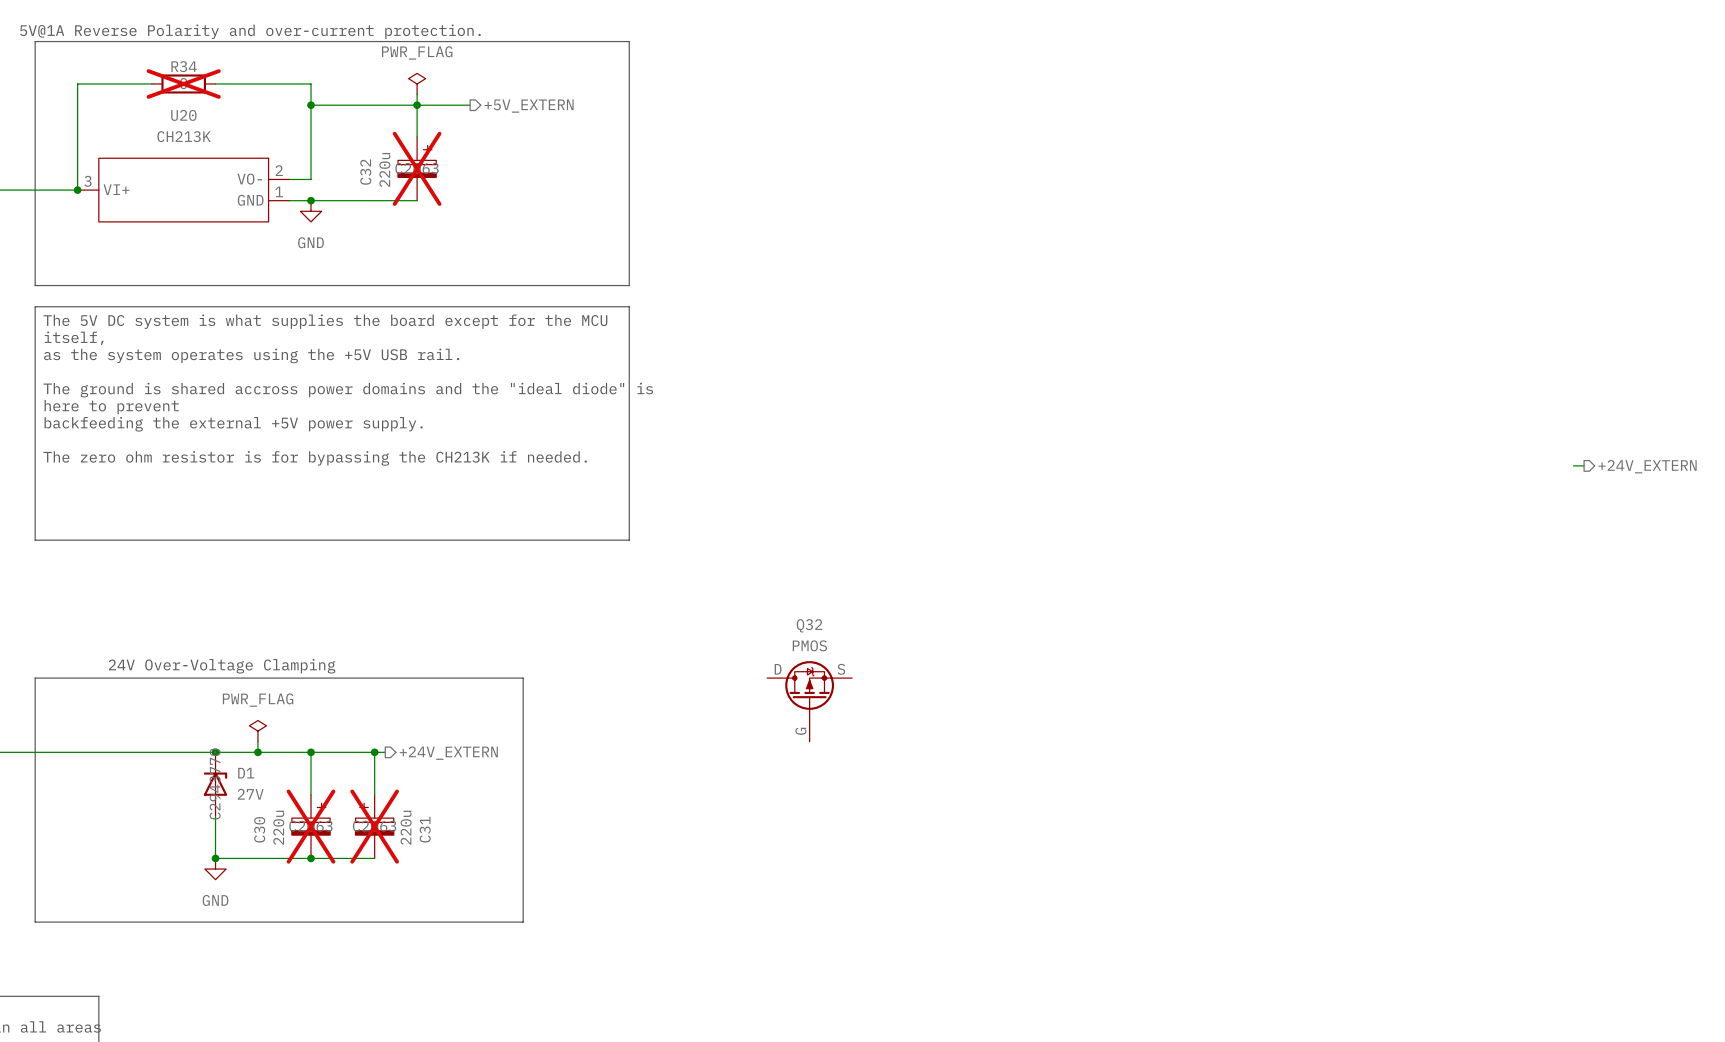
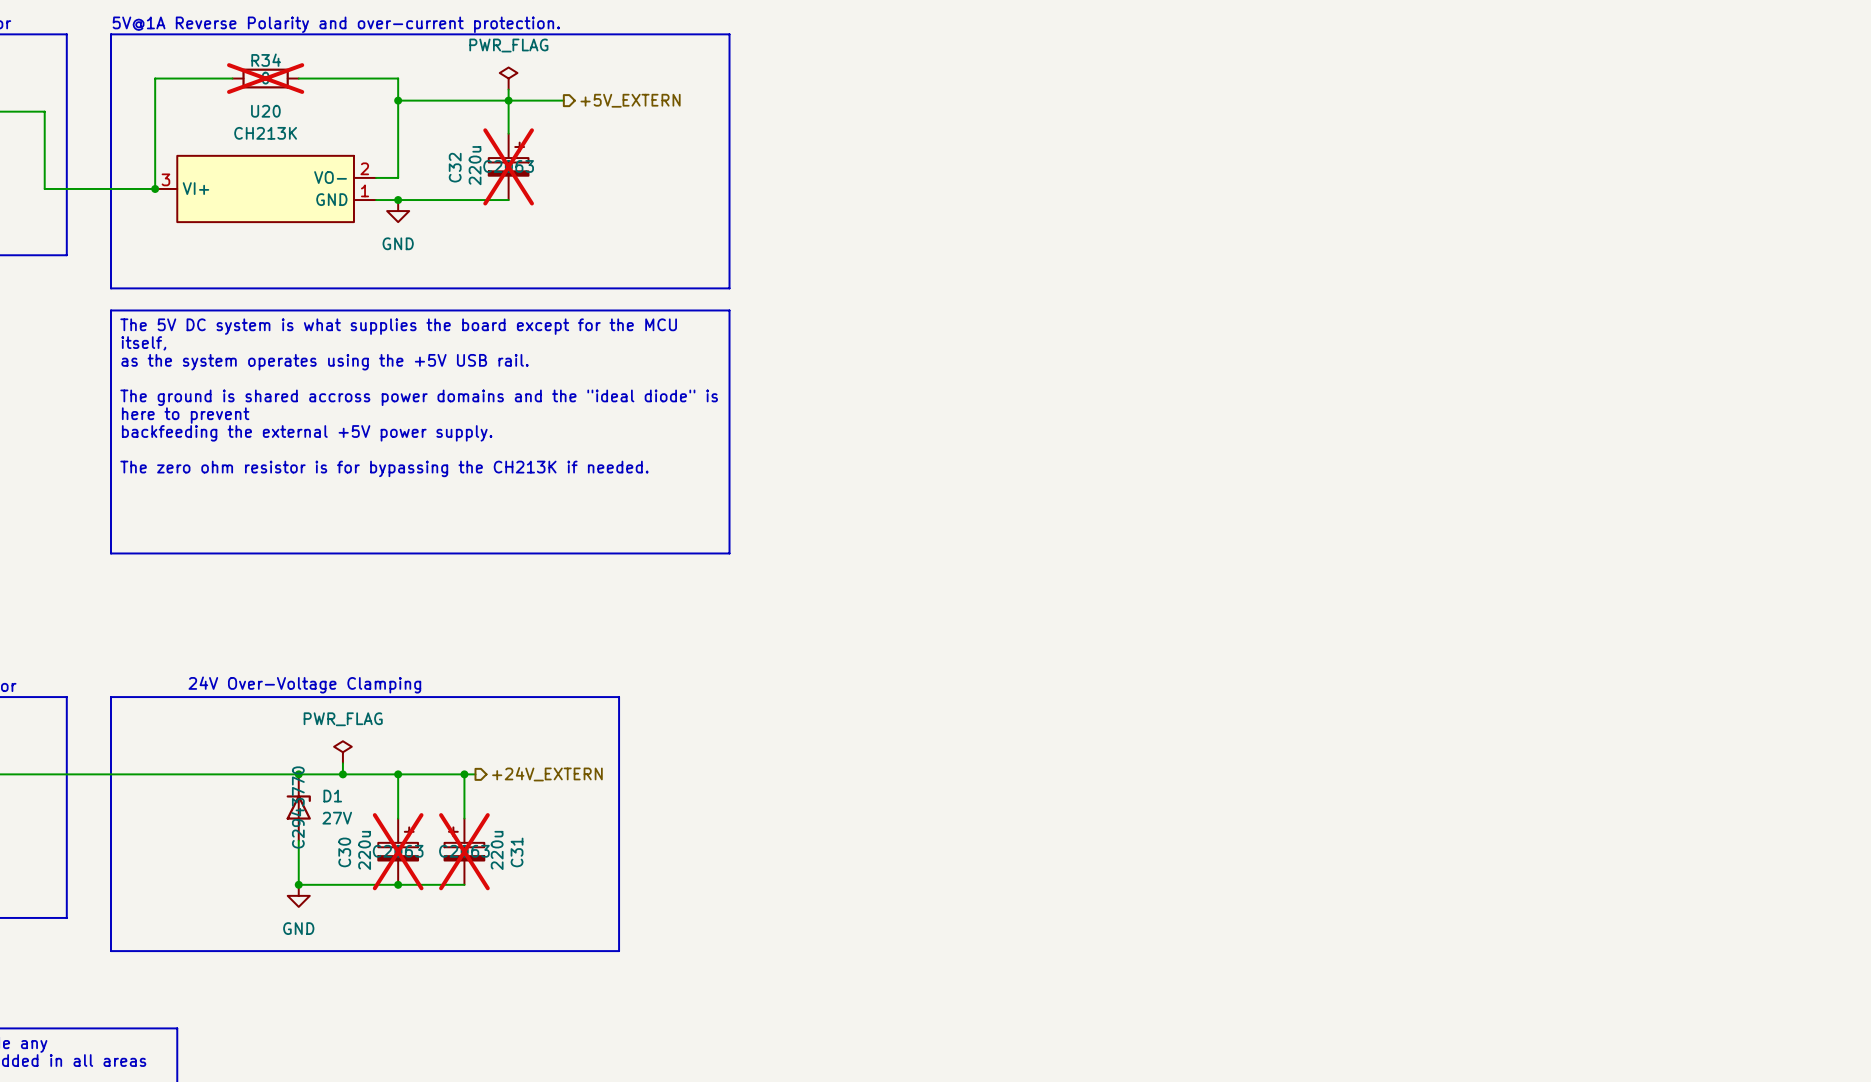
wire: (1573, 465) (1584, 465) -> none
hierarchical label: +24V_EXTERN (1647, 466) -> none
Q32: PMOS (809, 701) -> none

